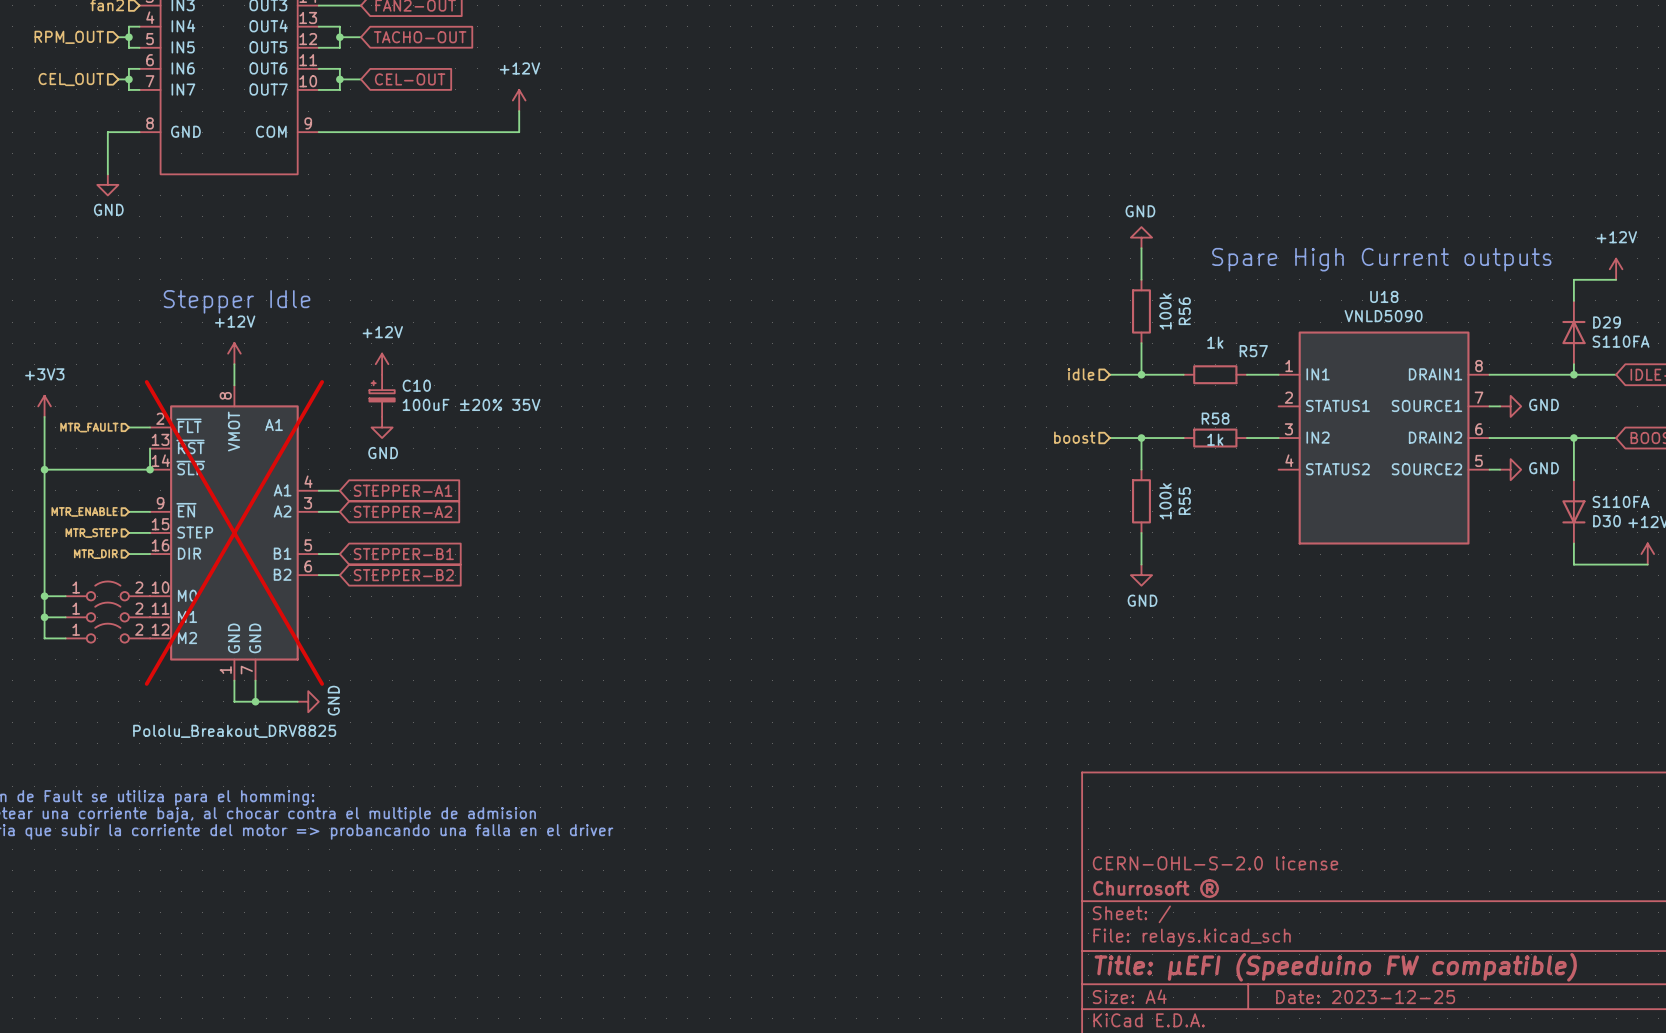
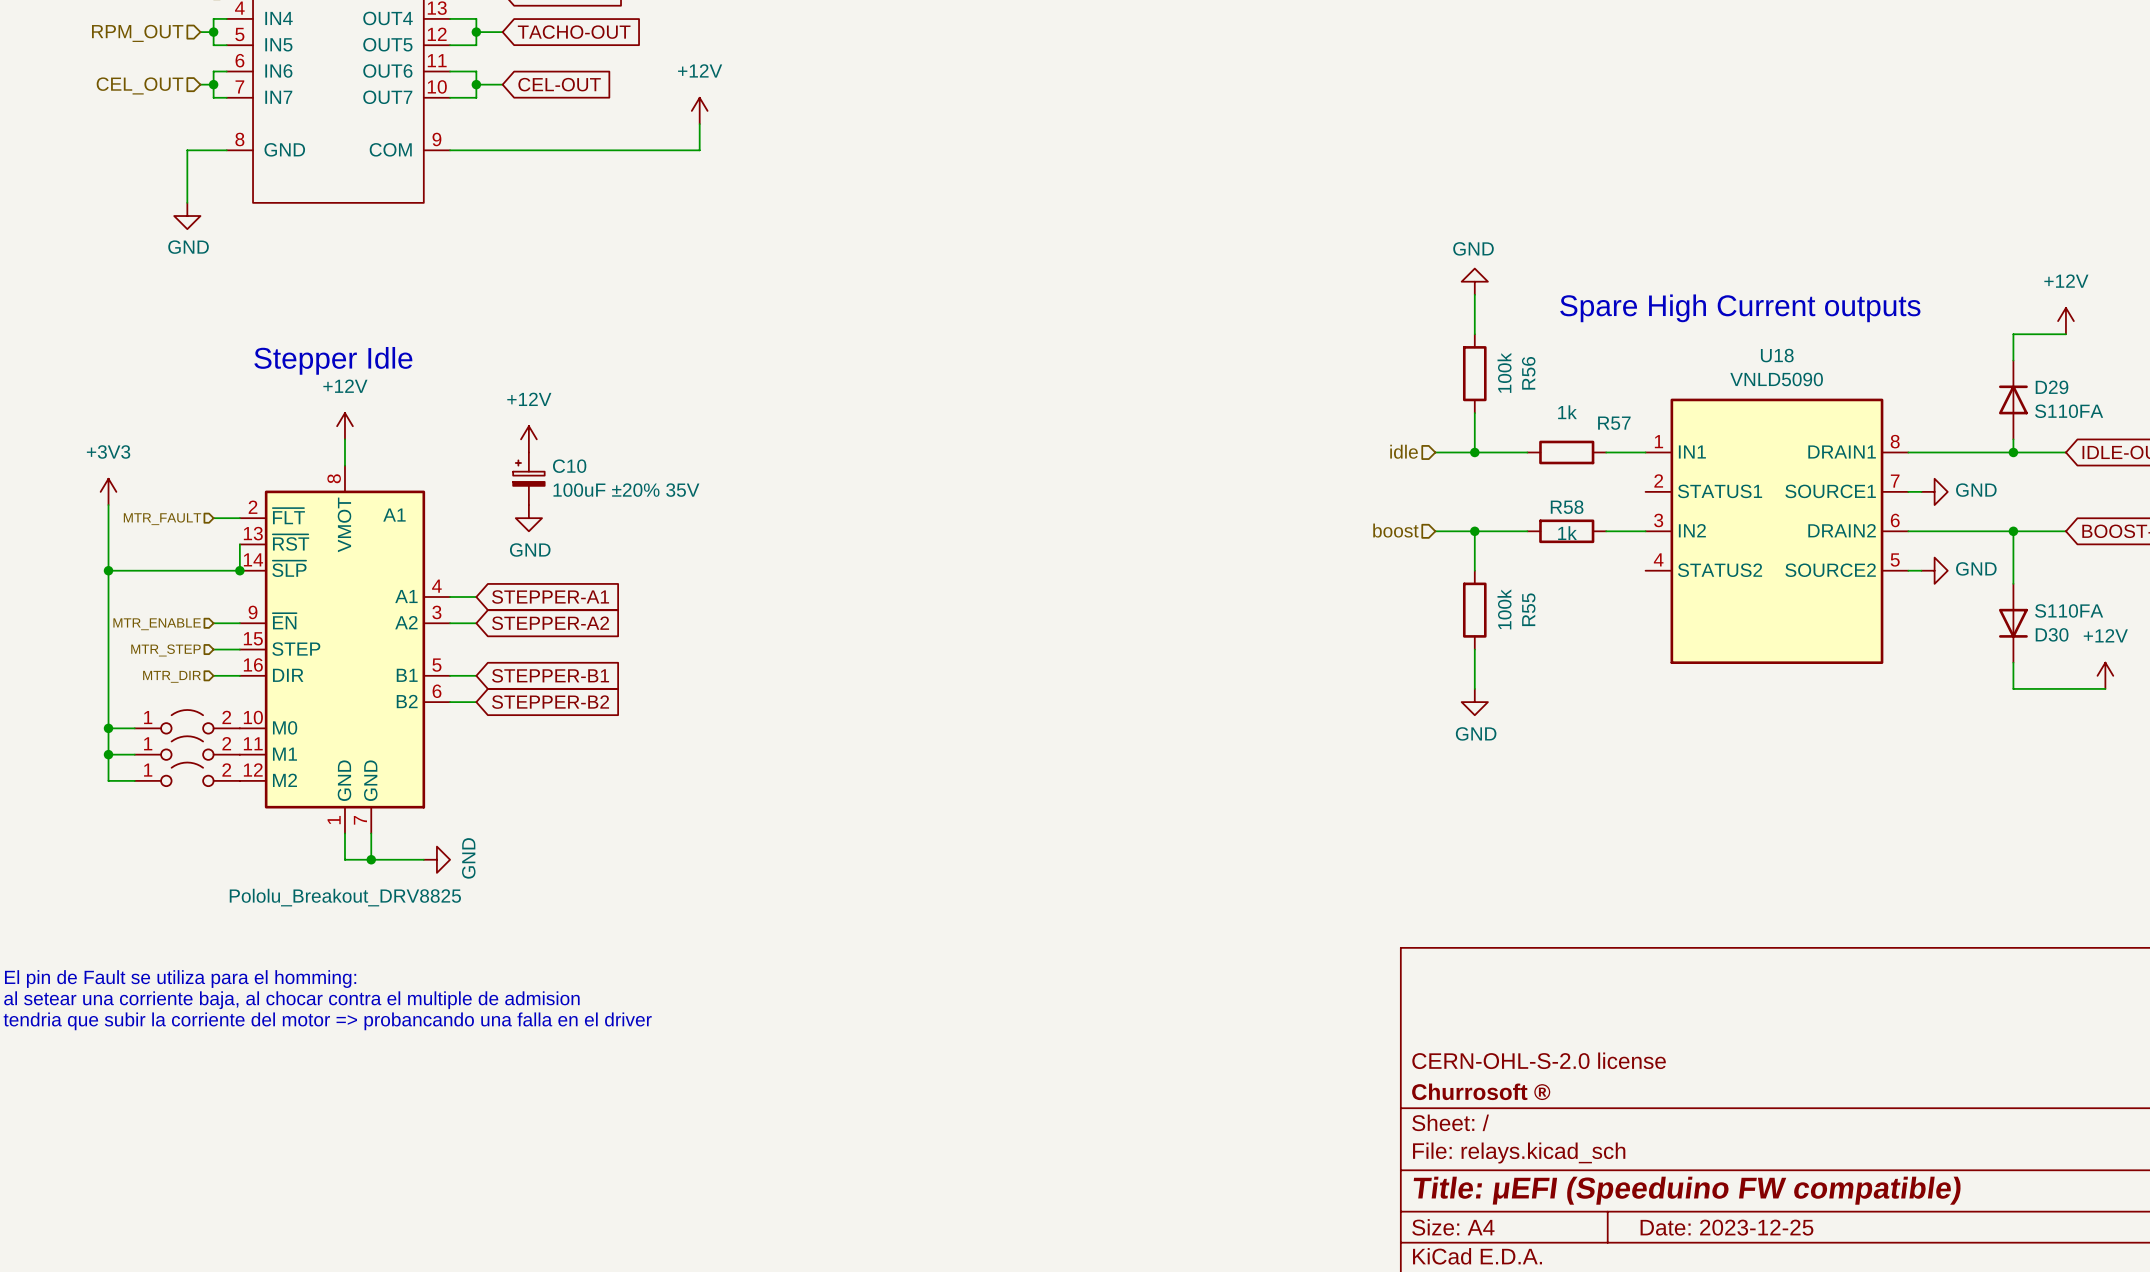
A1 do-not-place cross: (234, 532) -> none

